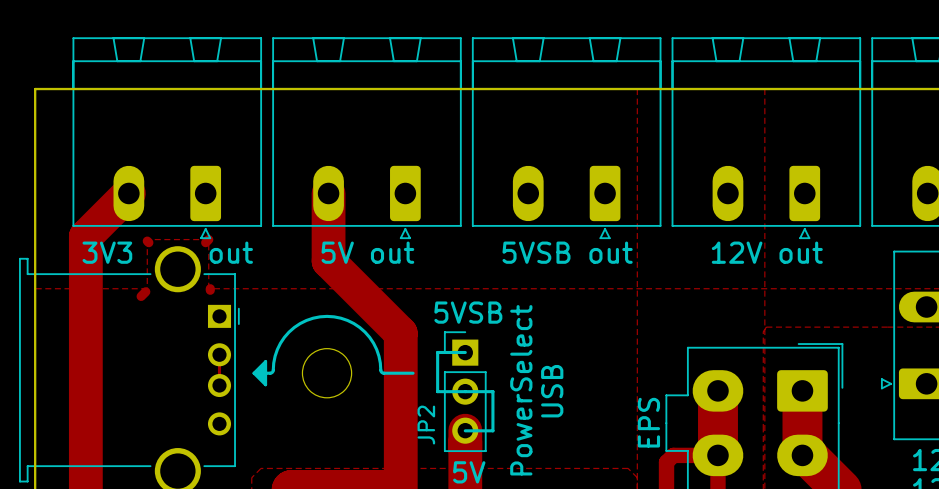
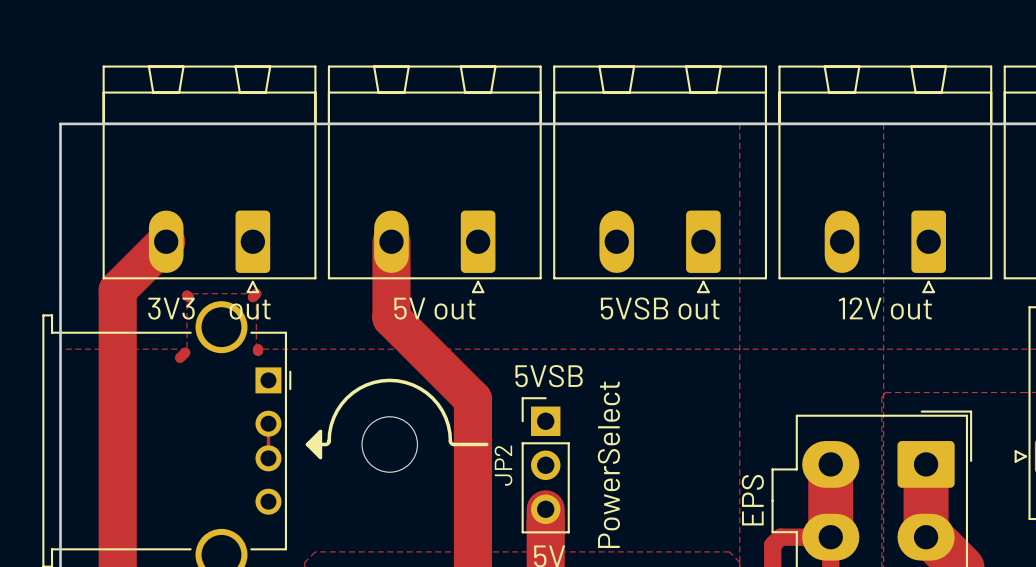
line: (465, 352) (437, 352) (437, 391) (492, 391) (492, 430) (465, 430) -> none
text: USB (552, 391) -> none
JP2 name position: JP2 (426, 425) -> JP2 (503, 465)

